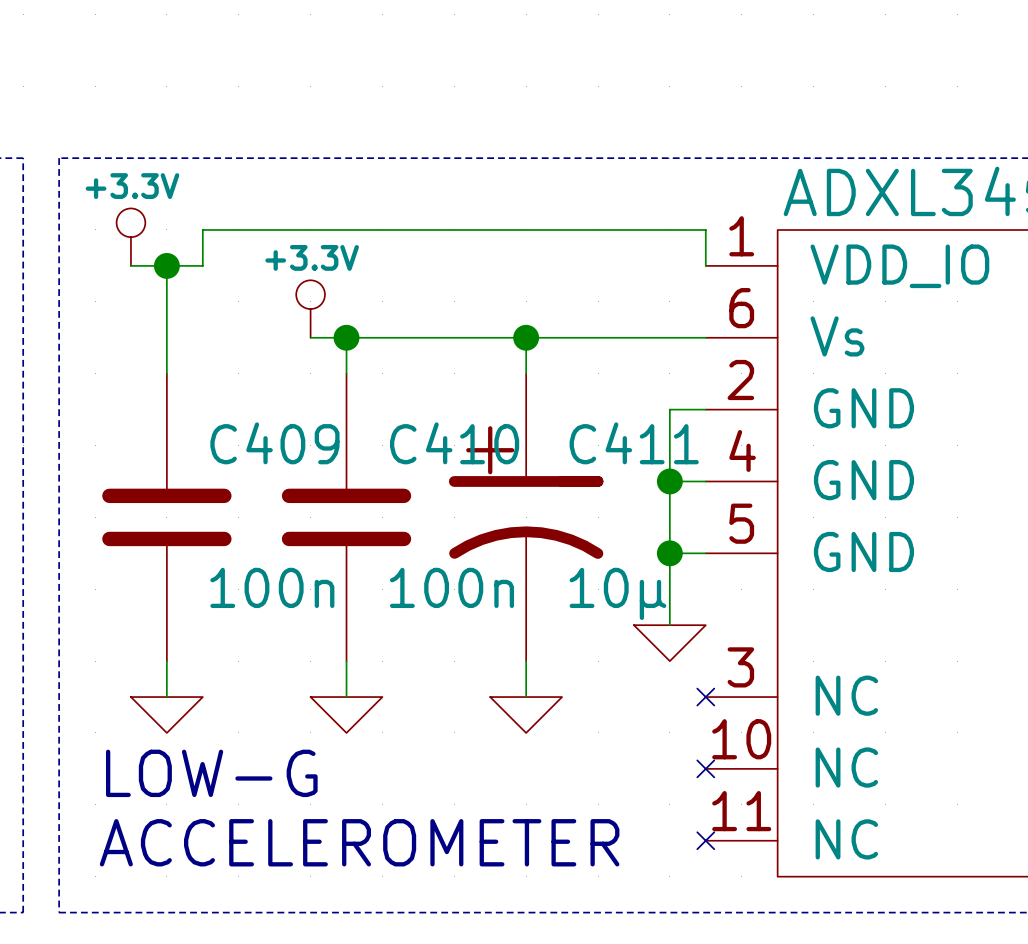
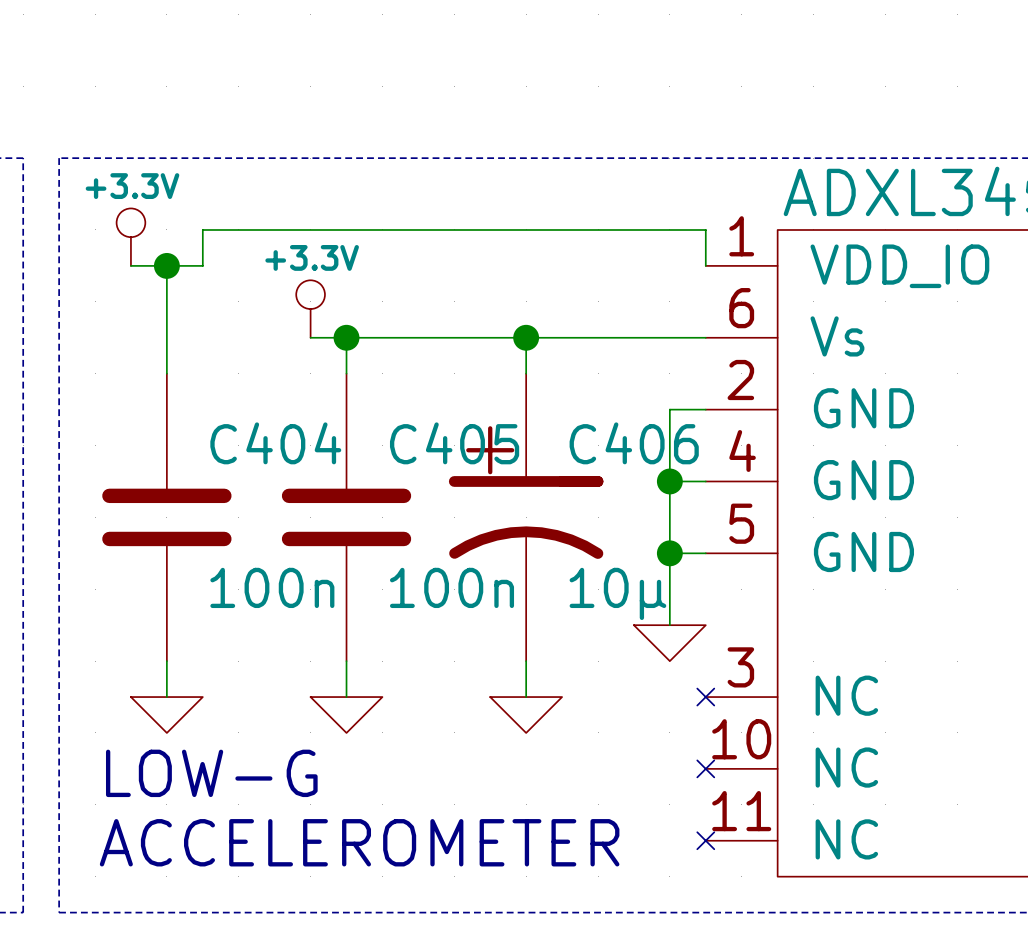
C409 name: C409 (274, 443) -> C404 (275, 443)
C410 name: C410 (454, 443) -> C405 (454, 443)
C411 name: C411 (634, 443) -> C406 (634, 443)

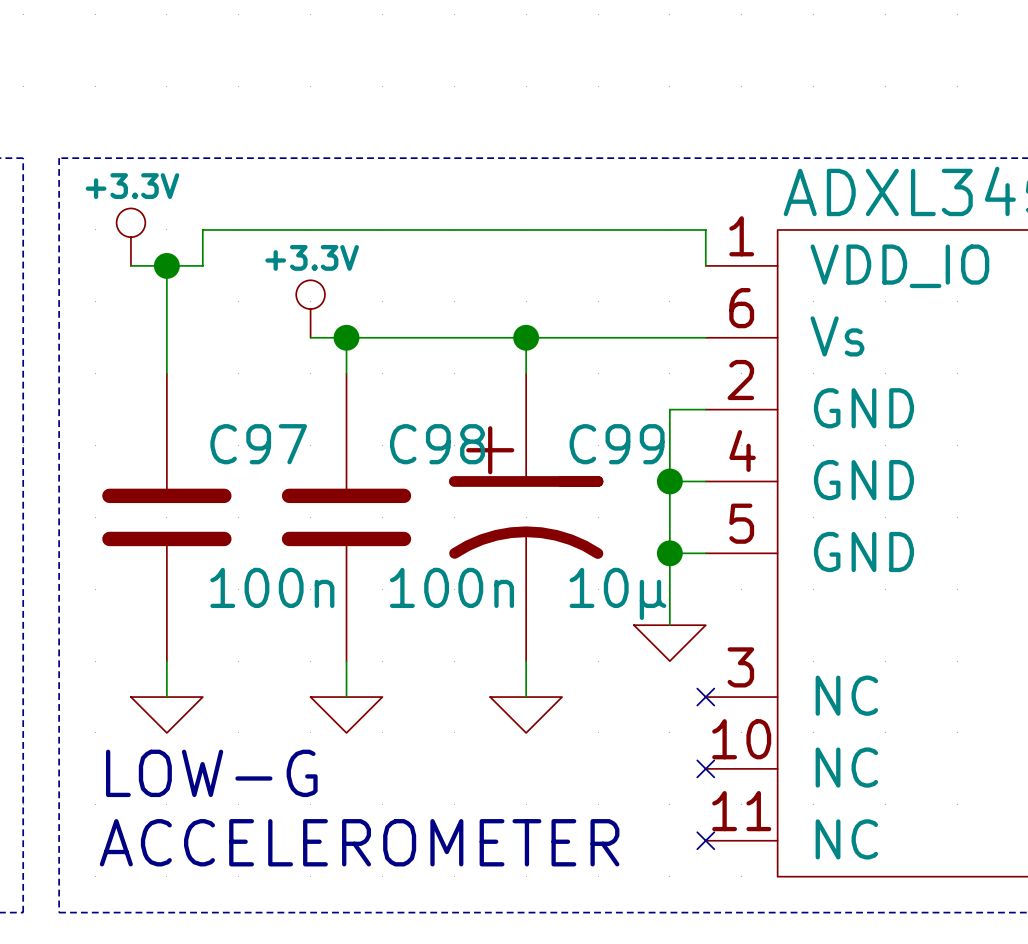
C404 name: C404 (275, 443) -> C97 (258, 444)
C405 name: C405 (454, 443) -> C98 (437, 444)
C406 name: C406 (634, 443) -> C99 (617, 444)

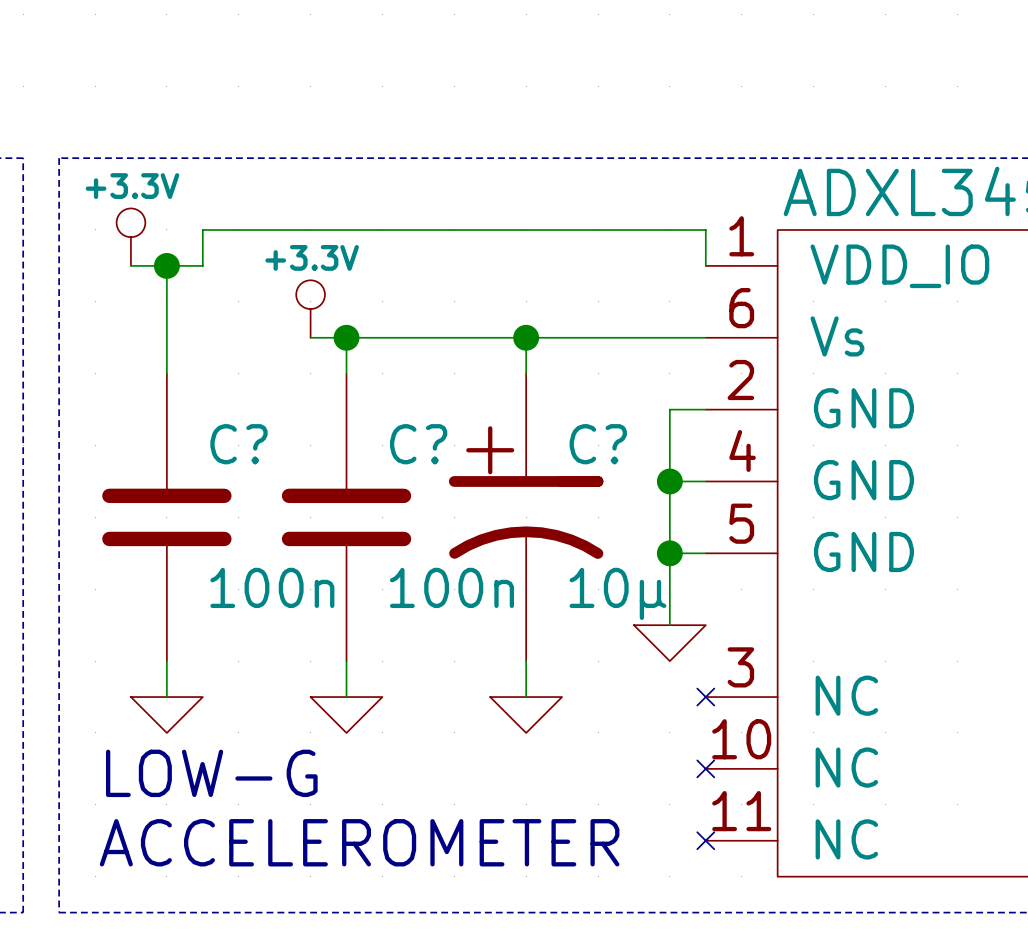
C97 name: C97 (258, 444) -> C? (239, 444)
C98 name: C98 (437, 444) -> C? (418, 444)
C99 name: C99 (617, 444) -> C? (598, 444)

